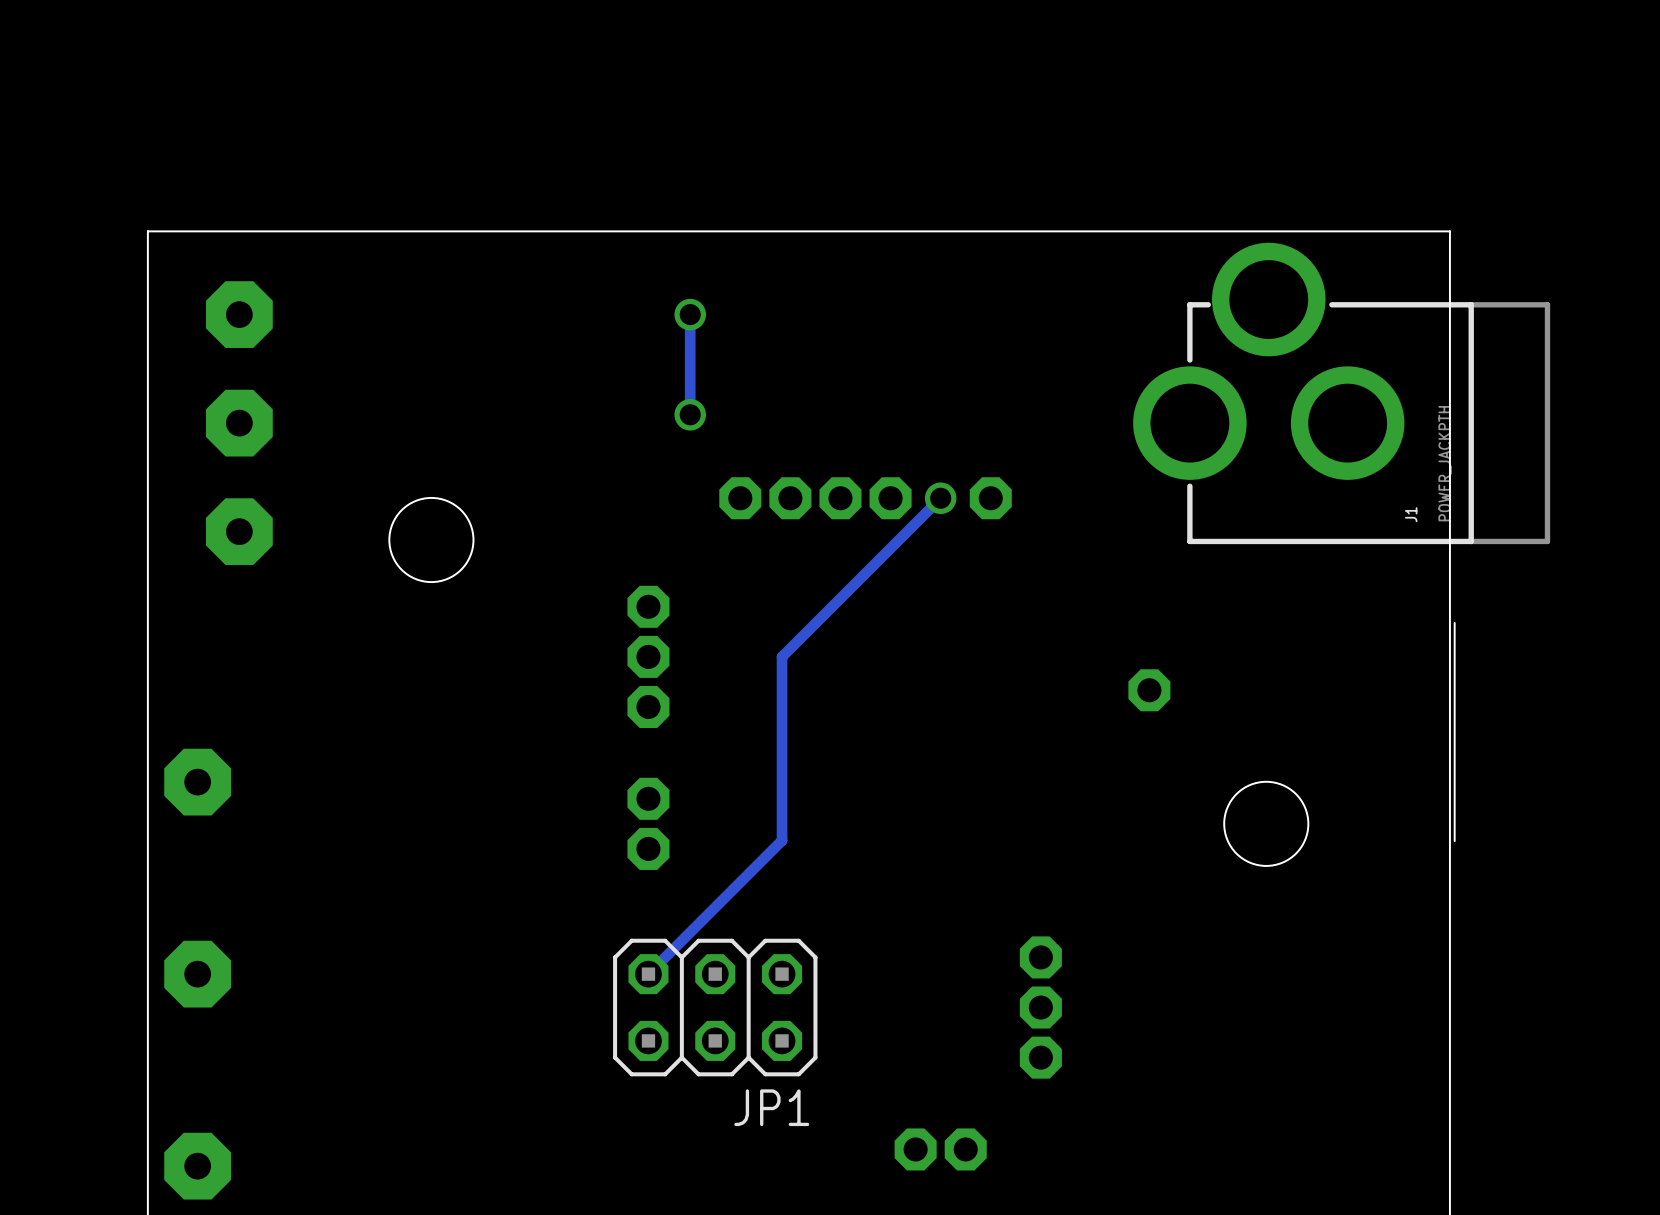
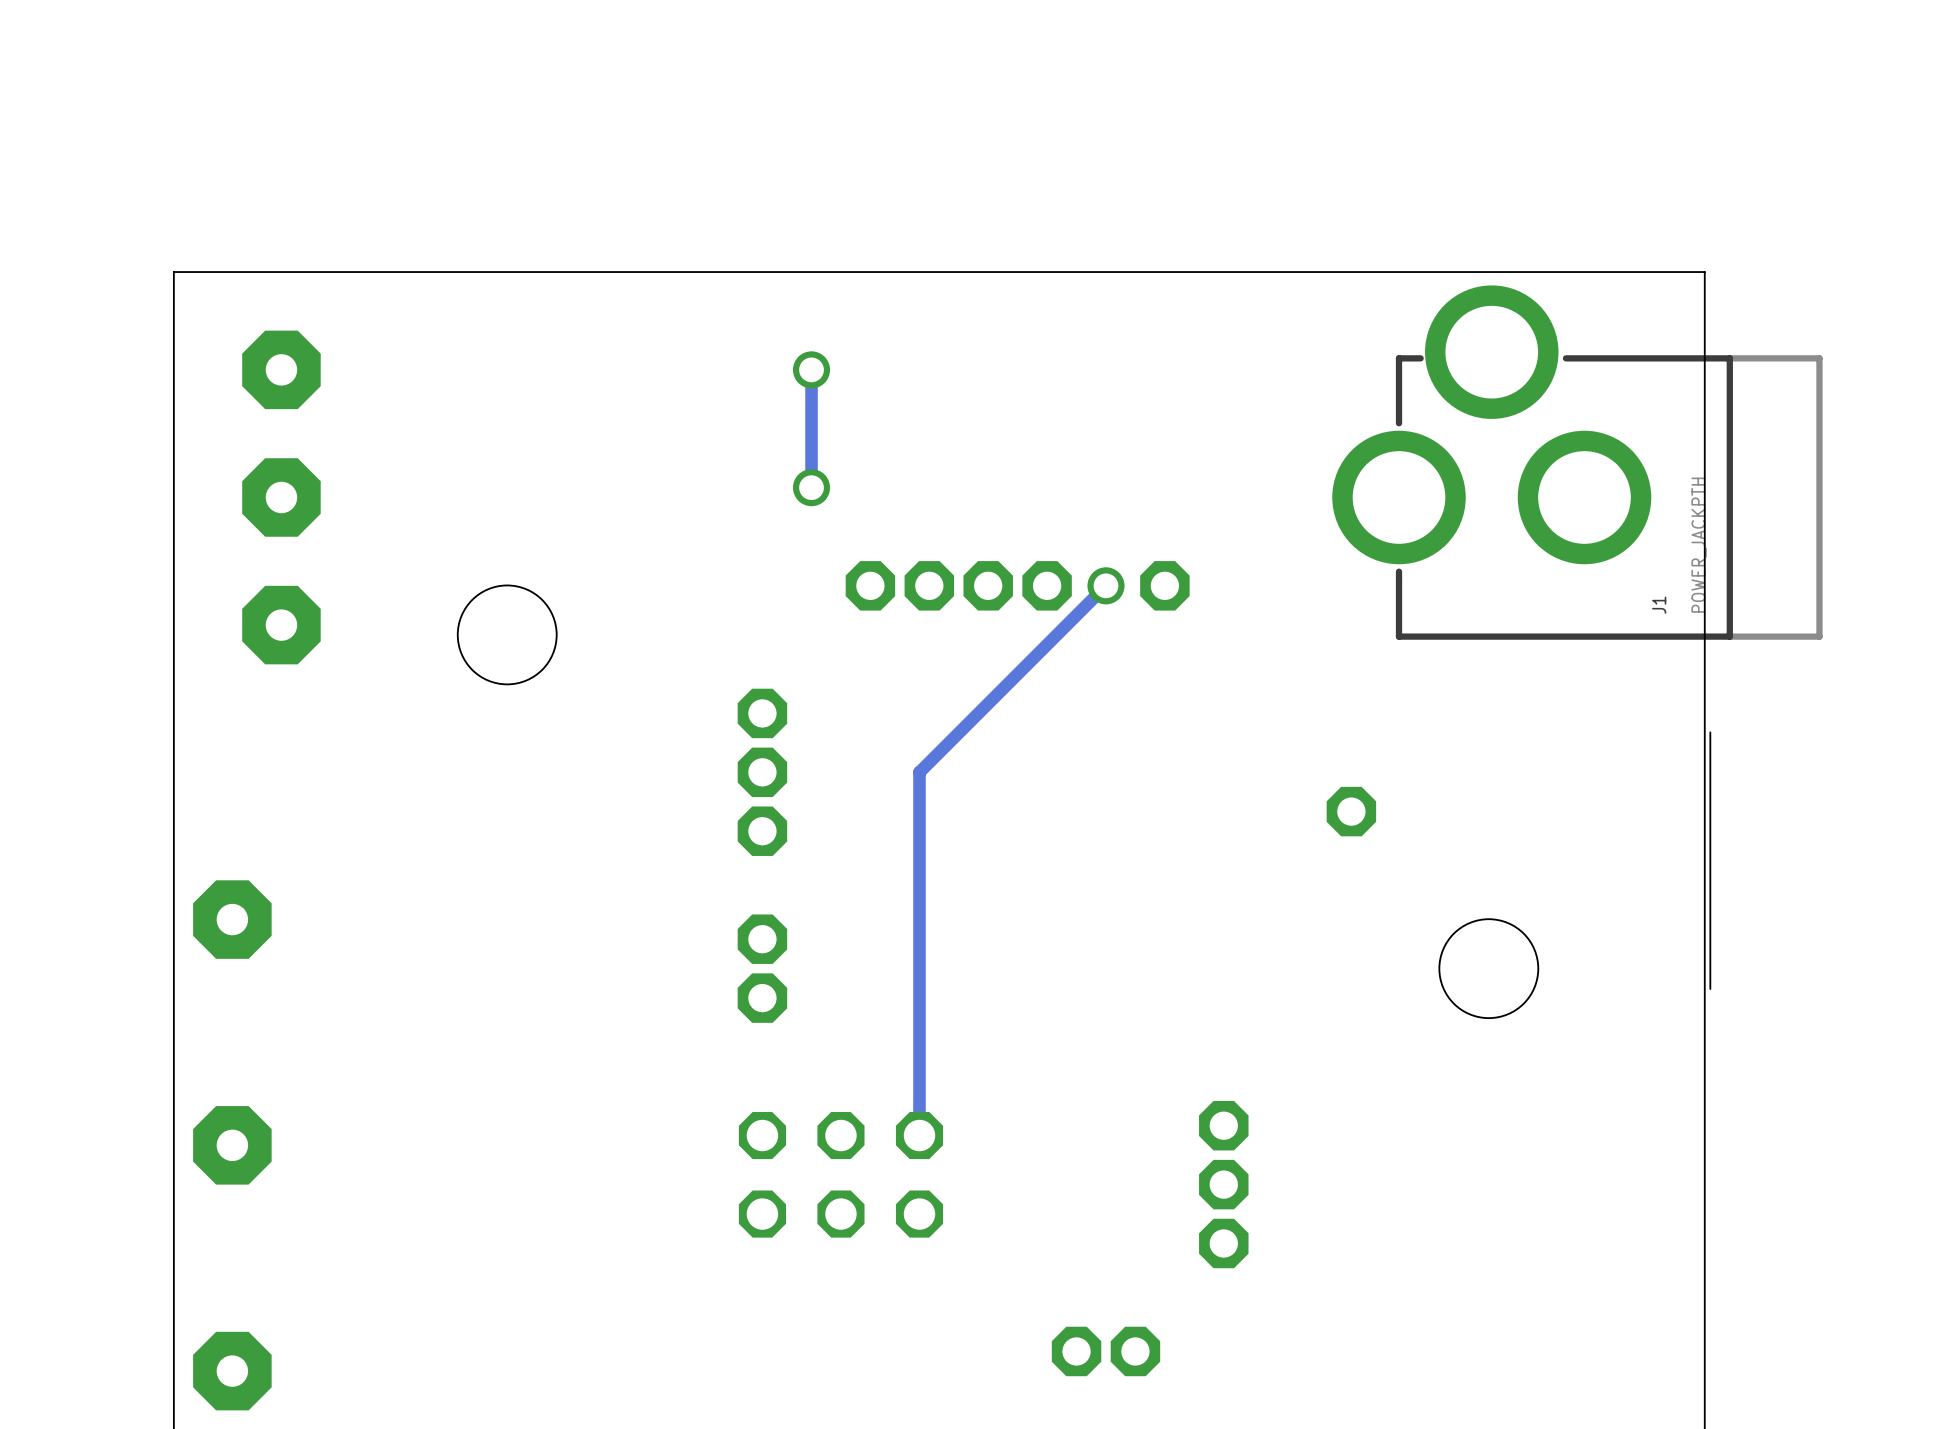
track: (782, 840) (648, 974) -> (919, 988) (919, 1135)
JP1 side: bottom (715, 1007) -> top (840, 1174)

